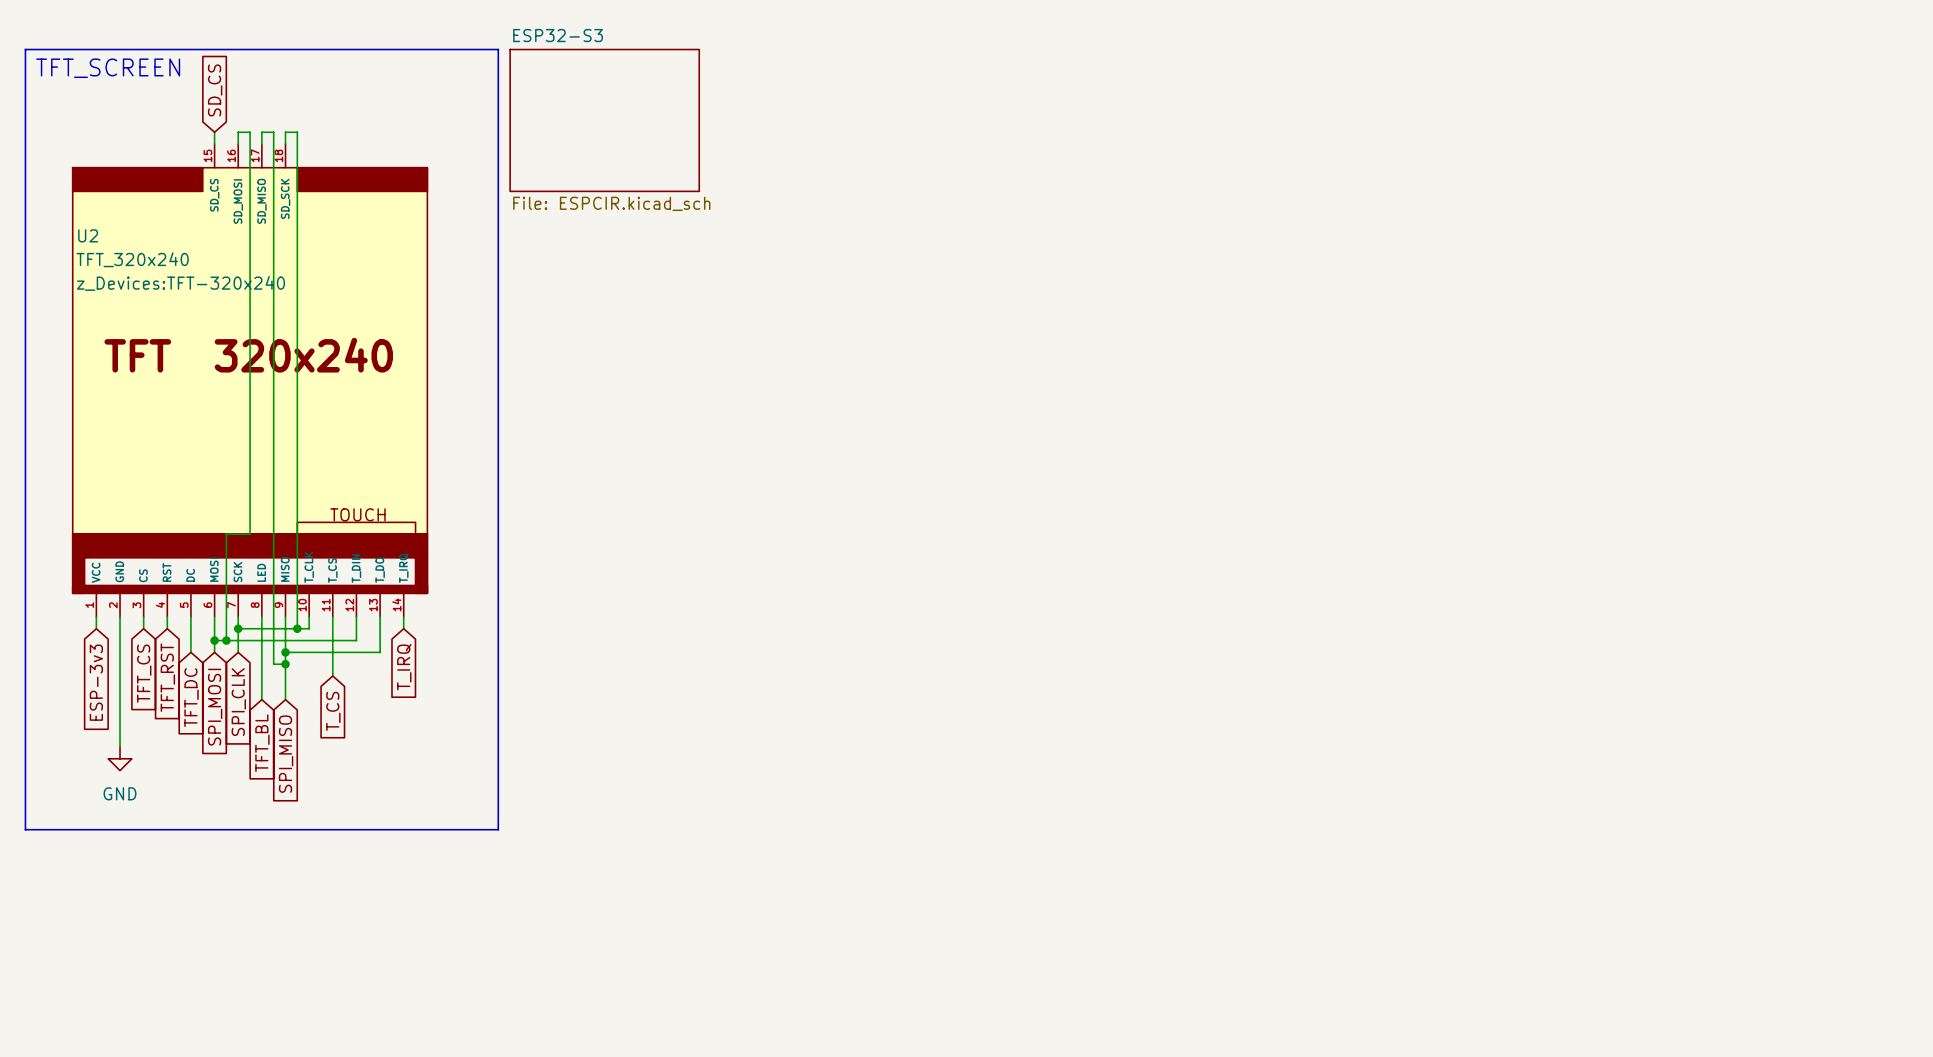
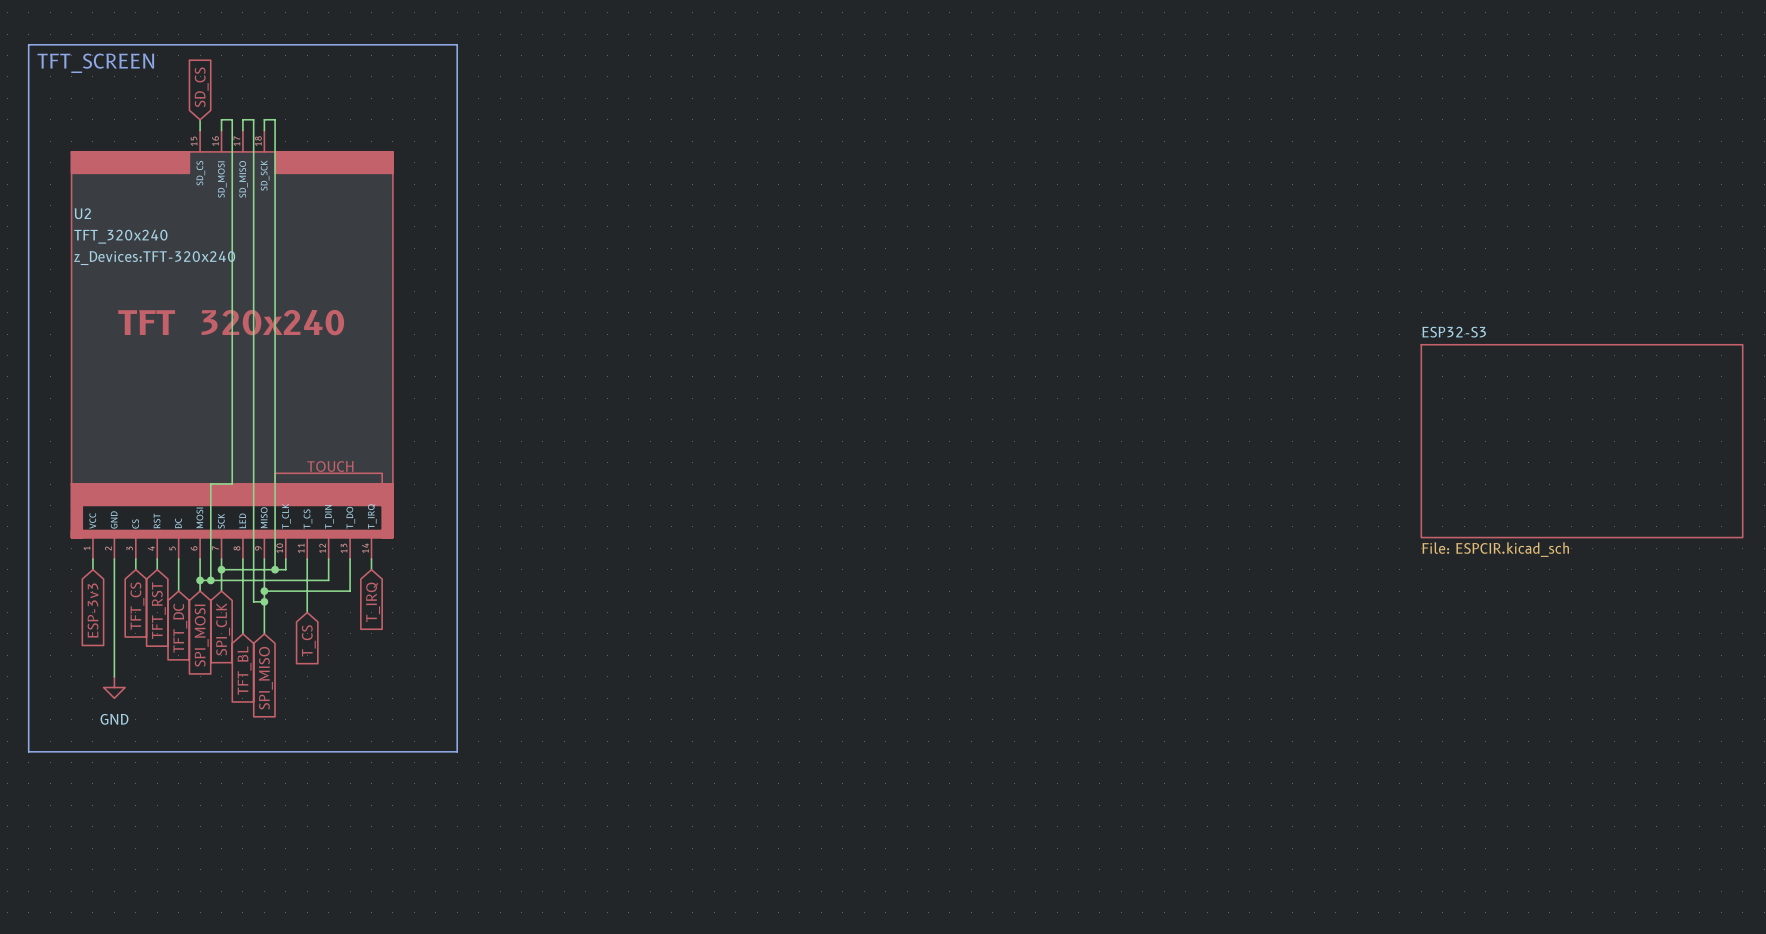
sheet ESP32-S3 name position: ESP32-S3 (558, 35) -> ESP32-S3 (1454, 332)
sheet ESP32-S3 shape: [509, 48, 700, 193] -> [1420, 344, 1744, 539]
sheet ESP32-S3 value position: File: ESPCIR.kicad_sch (611, 203) -> File: ESPCIR.kicad_sch (1495, 549)

